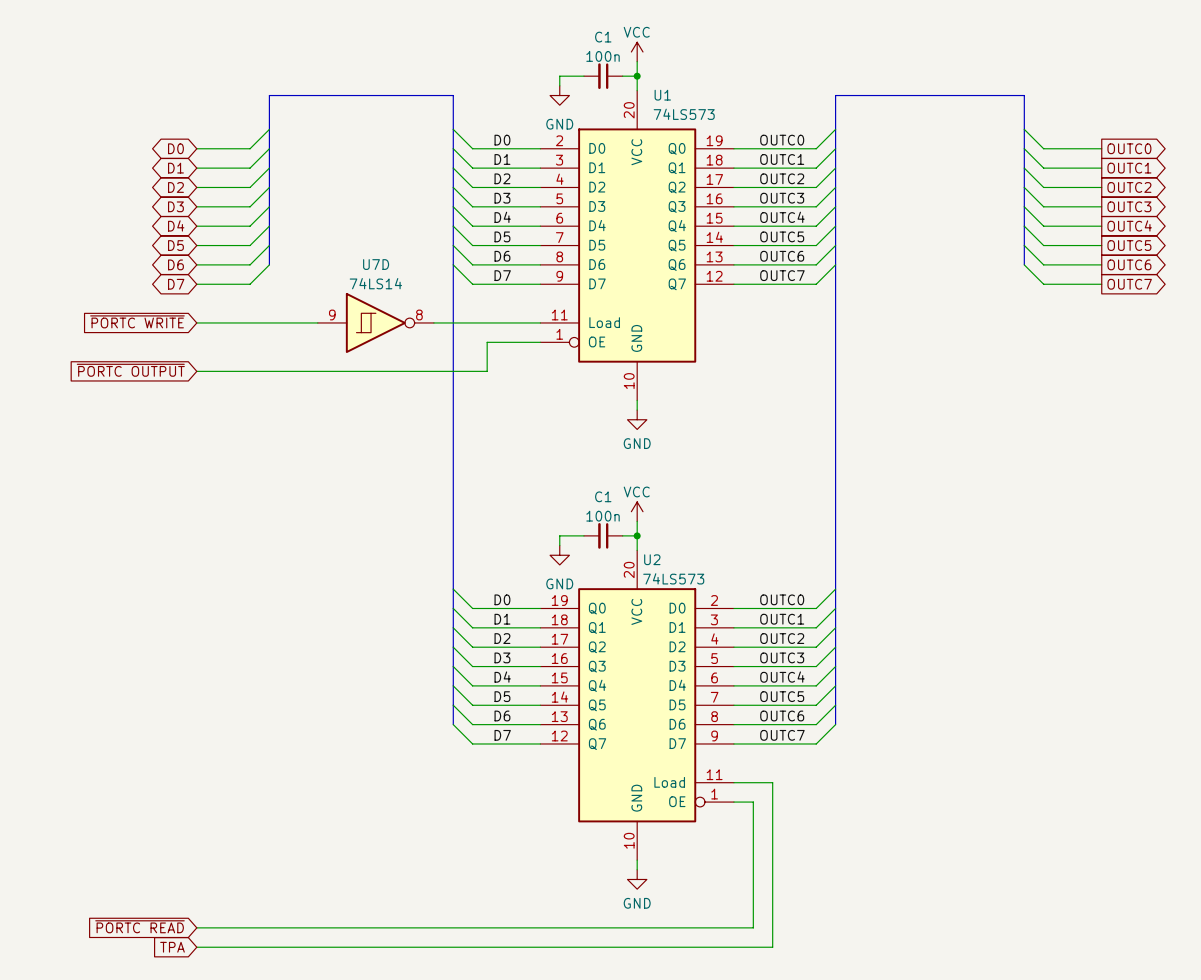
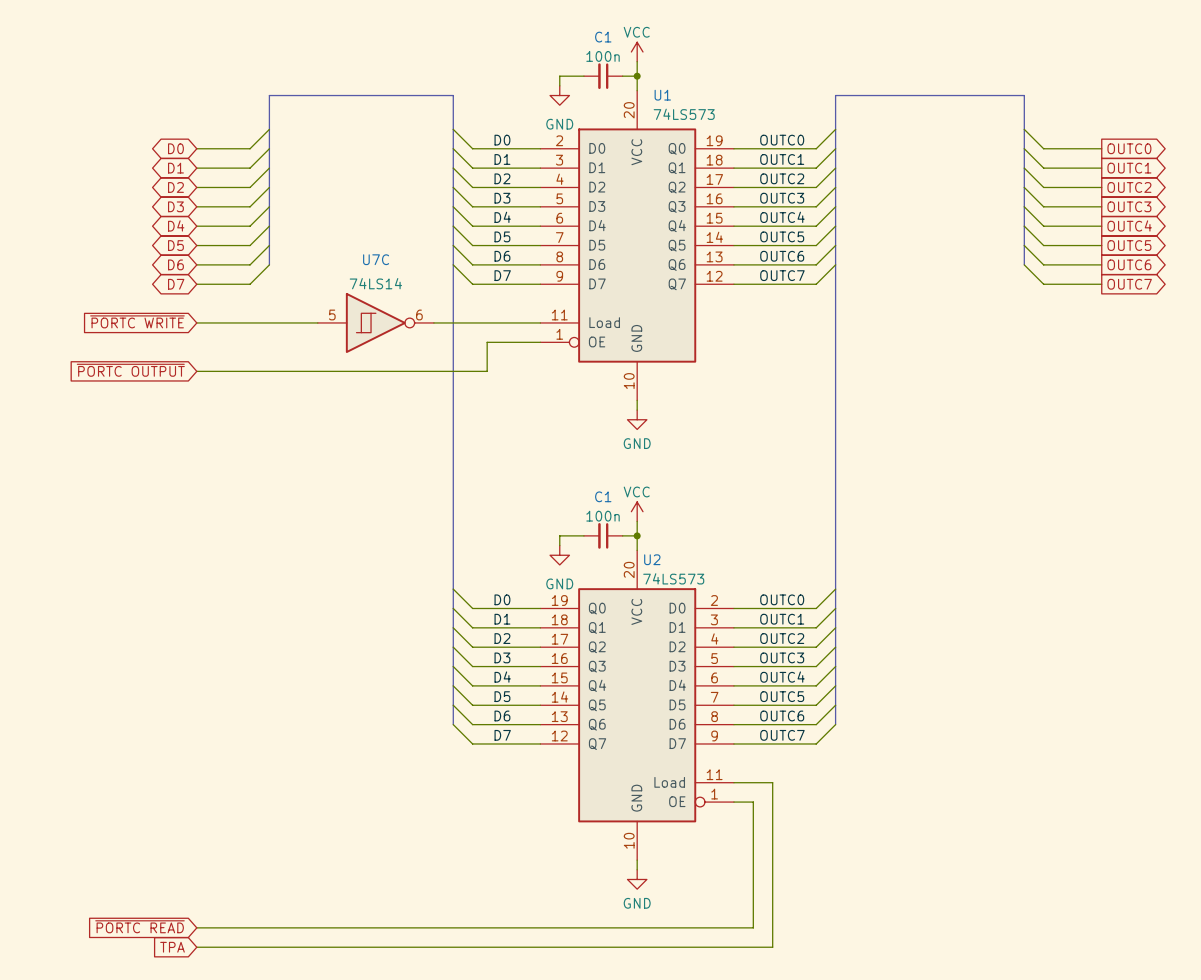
U7D name: U7D (376, 264) -> U7C (376, 259)
U7D pin number: 9 (332, 314) -> 5 (332, 314)
U7D pin number: 8 (419, 314) -> 6 (419, 314)

